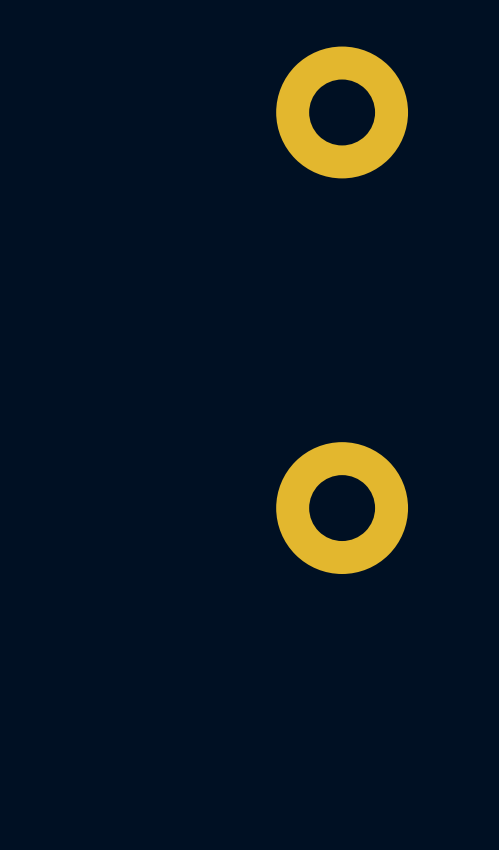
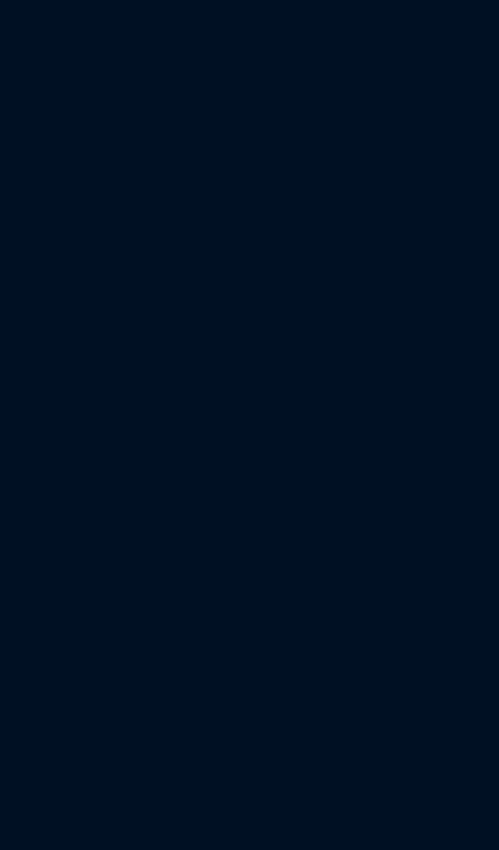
part: (342, 112) -> none
part: (342, 508) -> none

